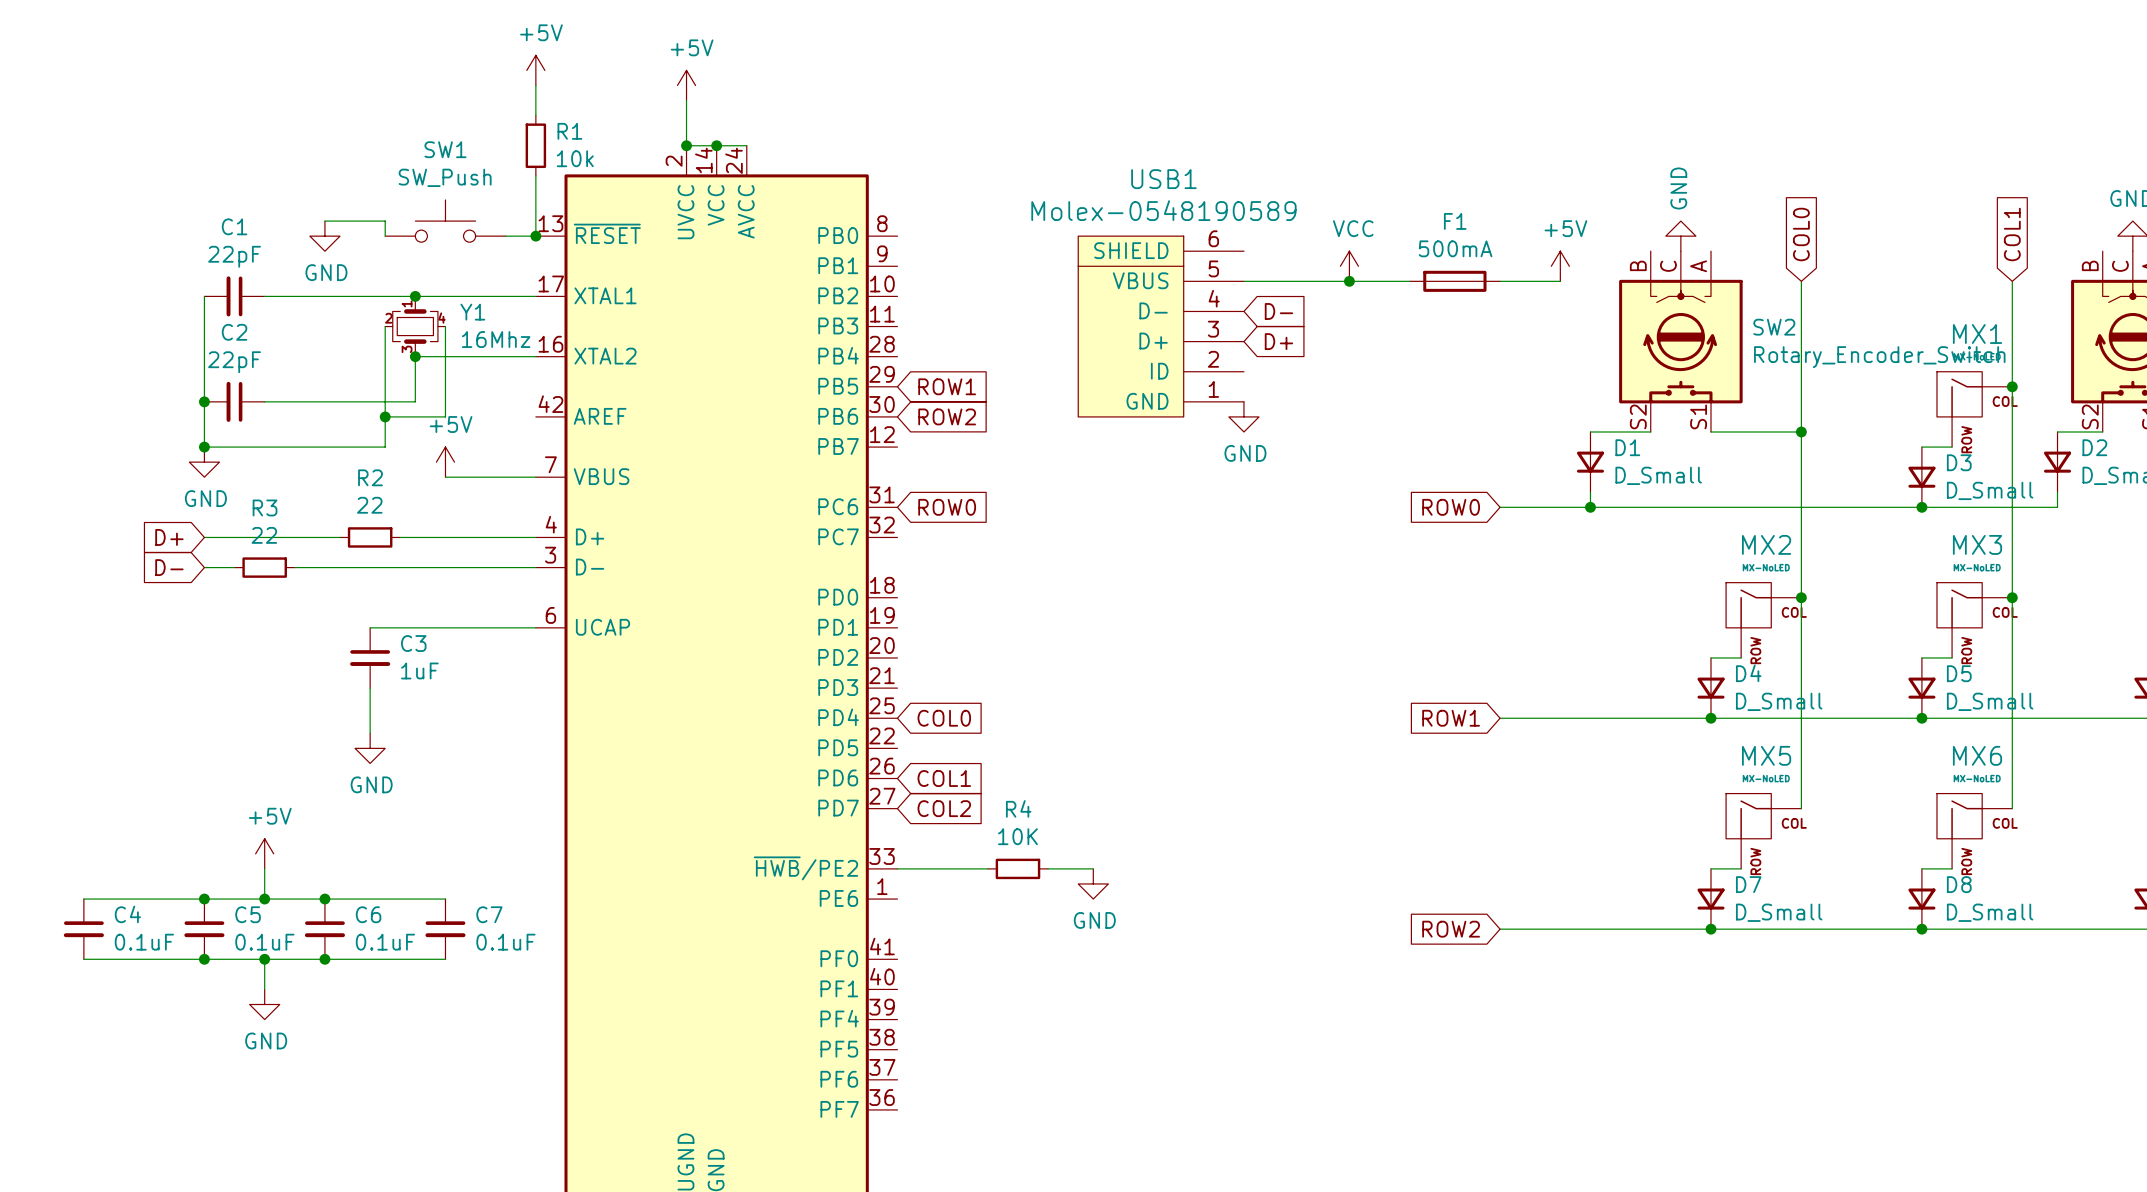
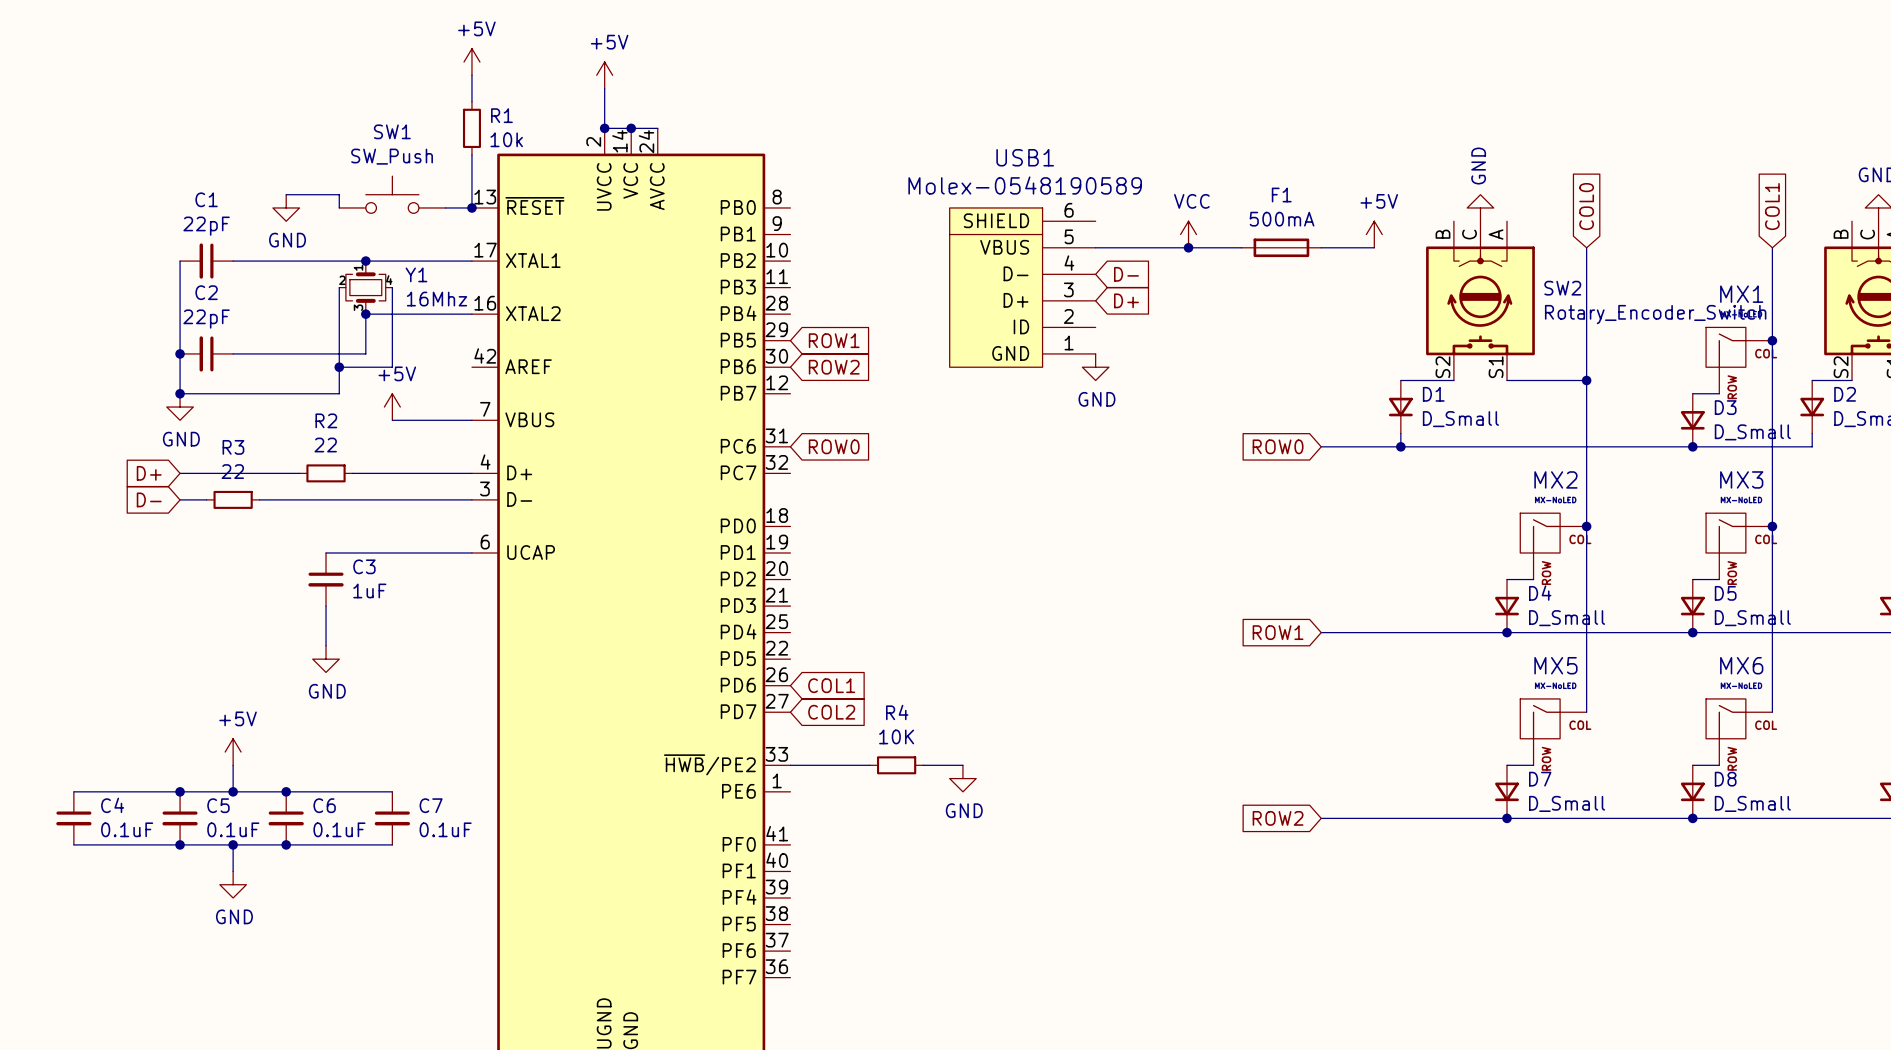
global label: COL0 (944, 718) -> none

